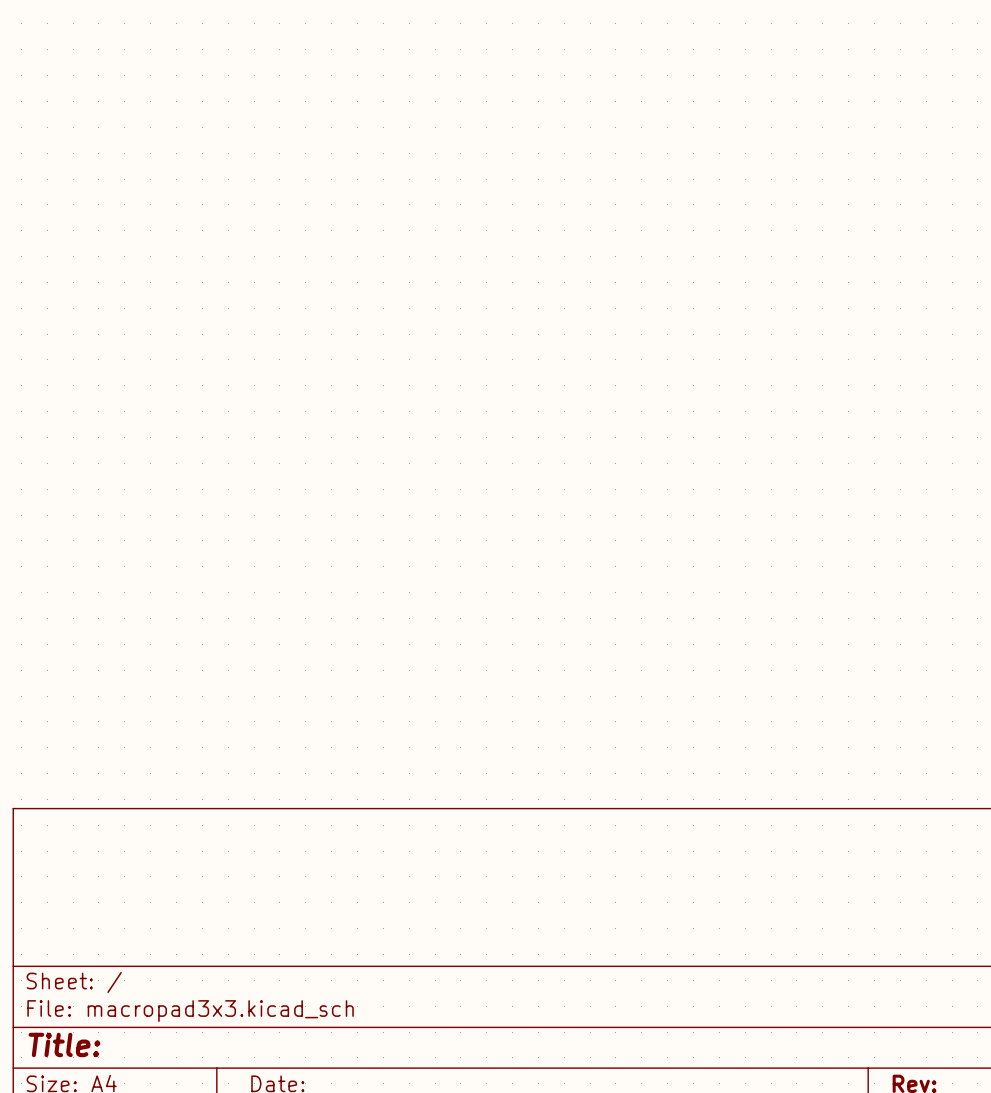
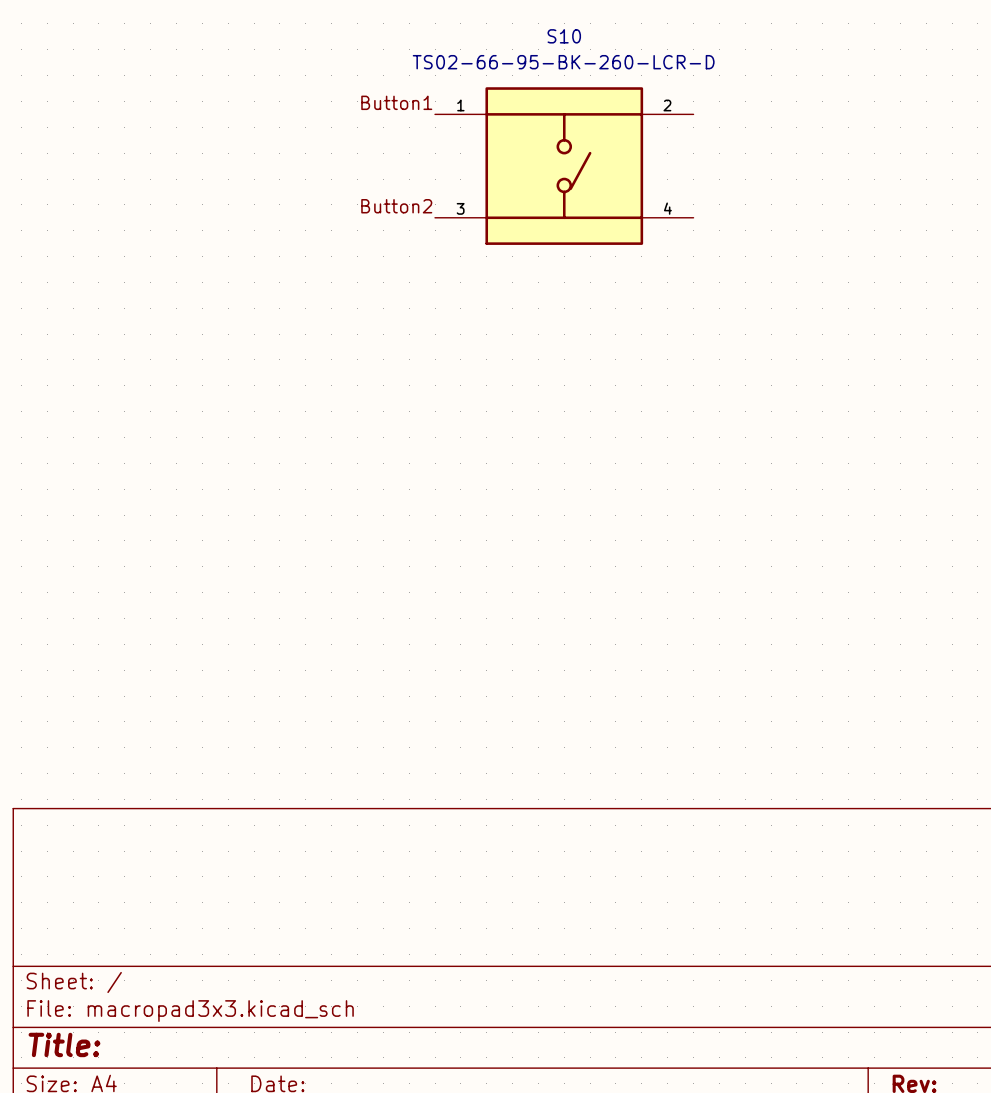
label: none -> Button1 (396, 102)
S10: none -> TS02-66-95-BK-260-LCR-D (564, 166)
label: none -> Button2 (396, 206)

